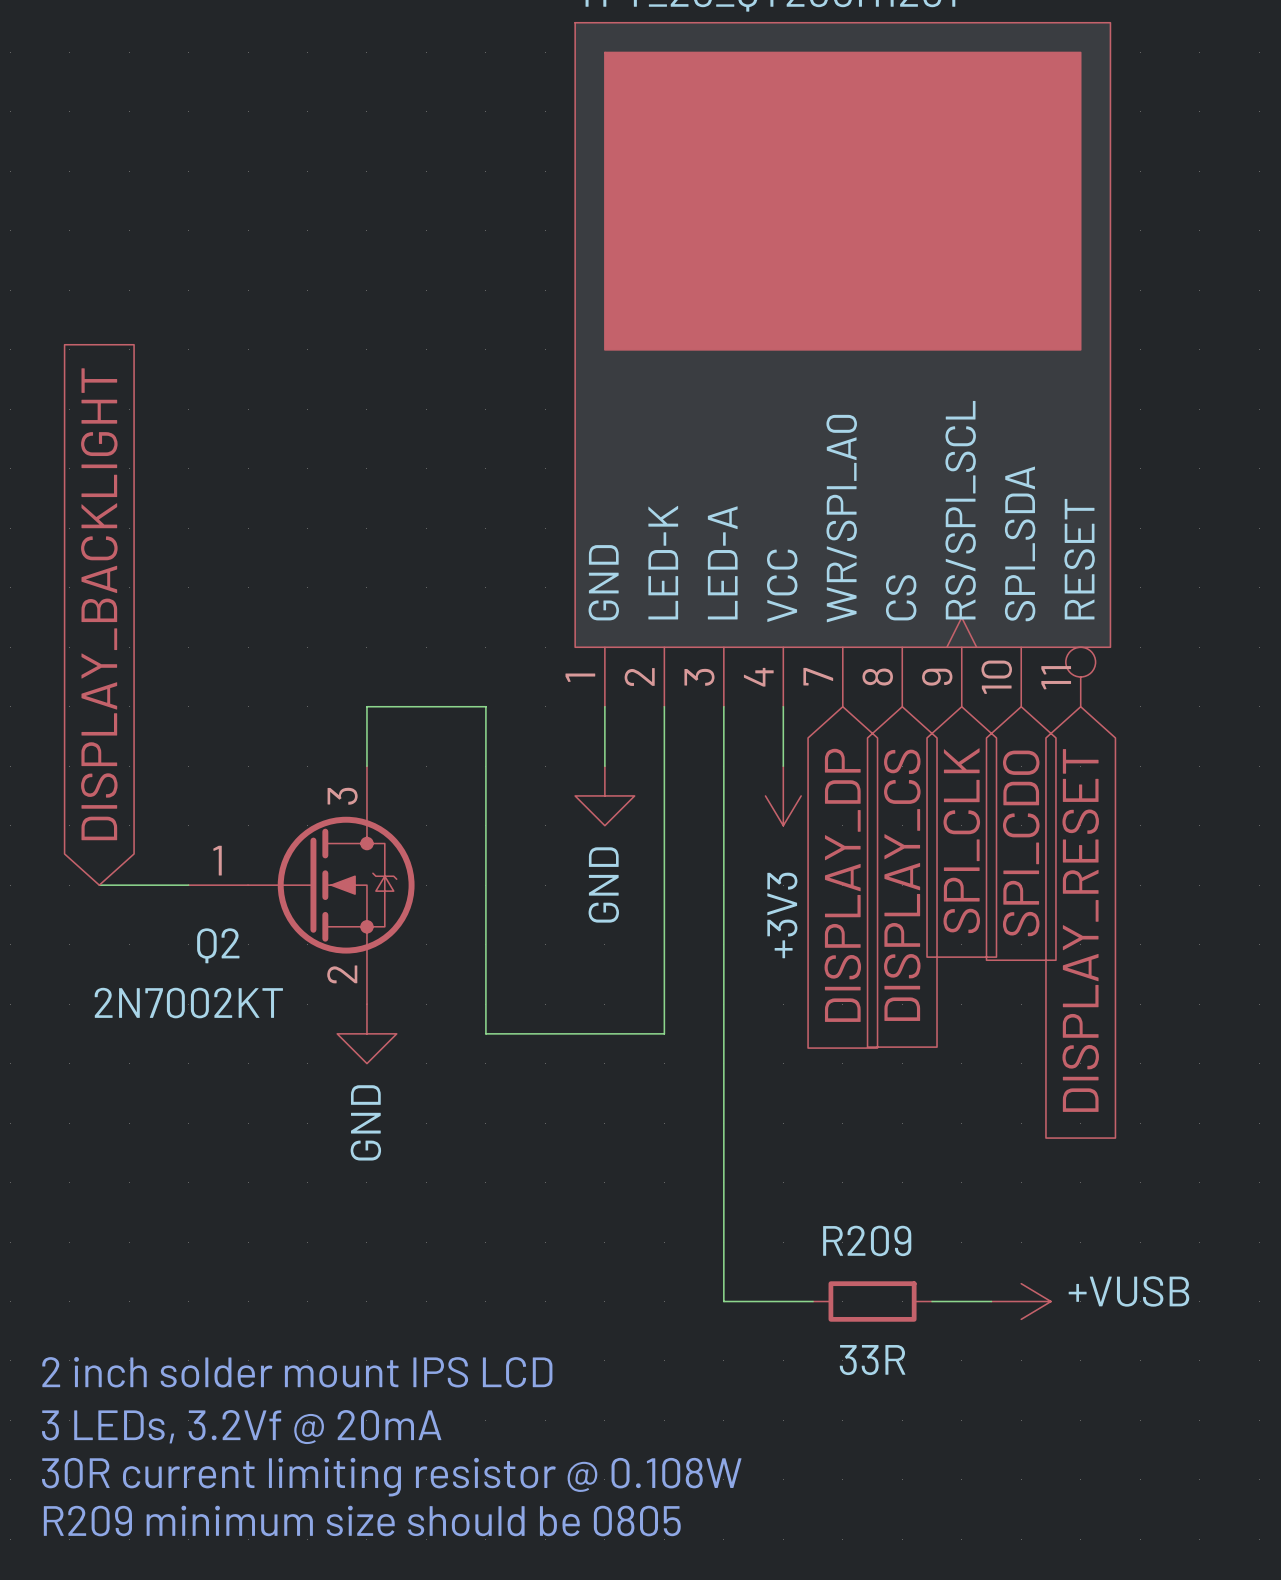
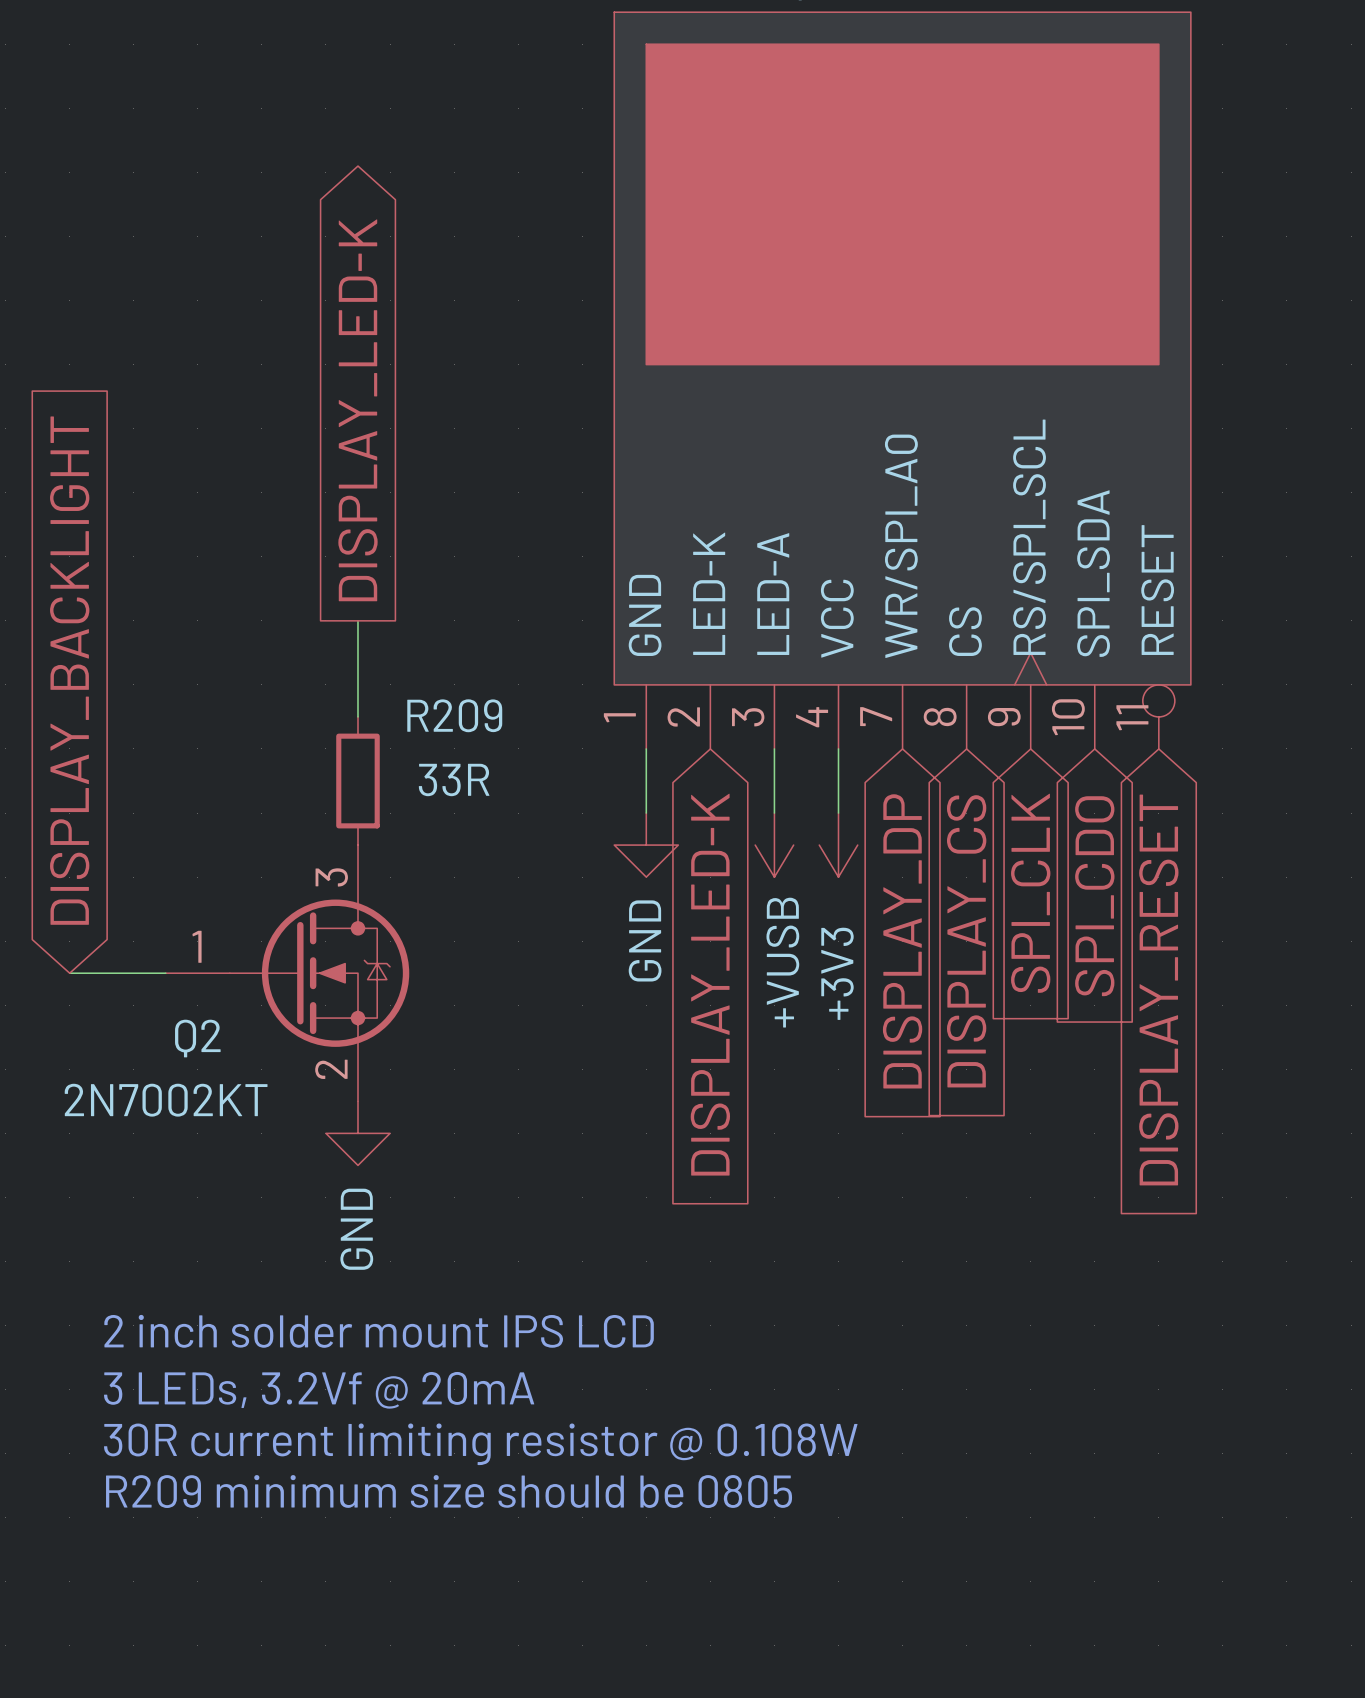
global label: none -> DISPLAY_LED-K (357, 410)
wire: none -> (357, 620) (357, 716)
global label position: DISPLAY_BACKLIGHT (99, 604) -> DISPLAY_BACKLIGHT (69, 670)
wire: (664, 706) (664, 1033) (485, 1033) (485, 706) (366, 706) (366, 766) -> none
wire: (723, 766) (723, 1301) (813, 1301) -> none
power symbol: none -> +VUSB (774, 845)
wire: (99, 885) (188, 885) -> (69, 973) (165, 973)
Q2 position: (301, 885) -> (287, 973)
global label: none -> DISPLAY_LED-K (710, 984)
power symbol position: GND (366, 1033) -> GND (357, 1133)
R209 name position: R209 (867, 1240) -> R209 (454, 715)
R209 rotation: 0° (872, 1301) -> 90° clockwise (357, 781)
R209 position: (872, 1301) -> (357, 781)
wire: (932, 1301) (991, 1301) -> none
power symbol: +VUSB (1021, 1301) -> none
R209 value position: 33R (872, 1360) -> 33R (454, 779)
text position: 2 inch solder mount IPS LCD (297, 1372) -> 2 inch solder mount IPS LCD (379, 1331)
text position: 3 LEDs, 3.2Vf @ 20mA (241, 1427) -> 3 LEDs, 3.2Vf @ 20mA (319, 1390)
text position: 30R current limiting resistor @ 0.108W (391, 1477) -> 30R current limiting resistor @ 0.108W (480, 1444)
text position: R209 minimum size should be 0805 (362, 1521) -> R209 minimum size should be 0805 (449, 1491)

